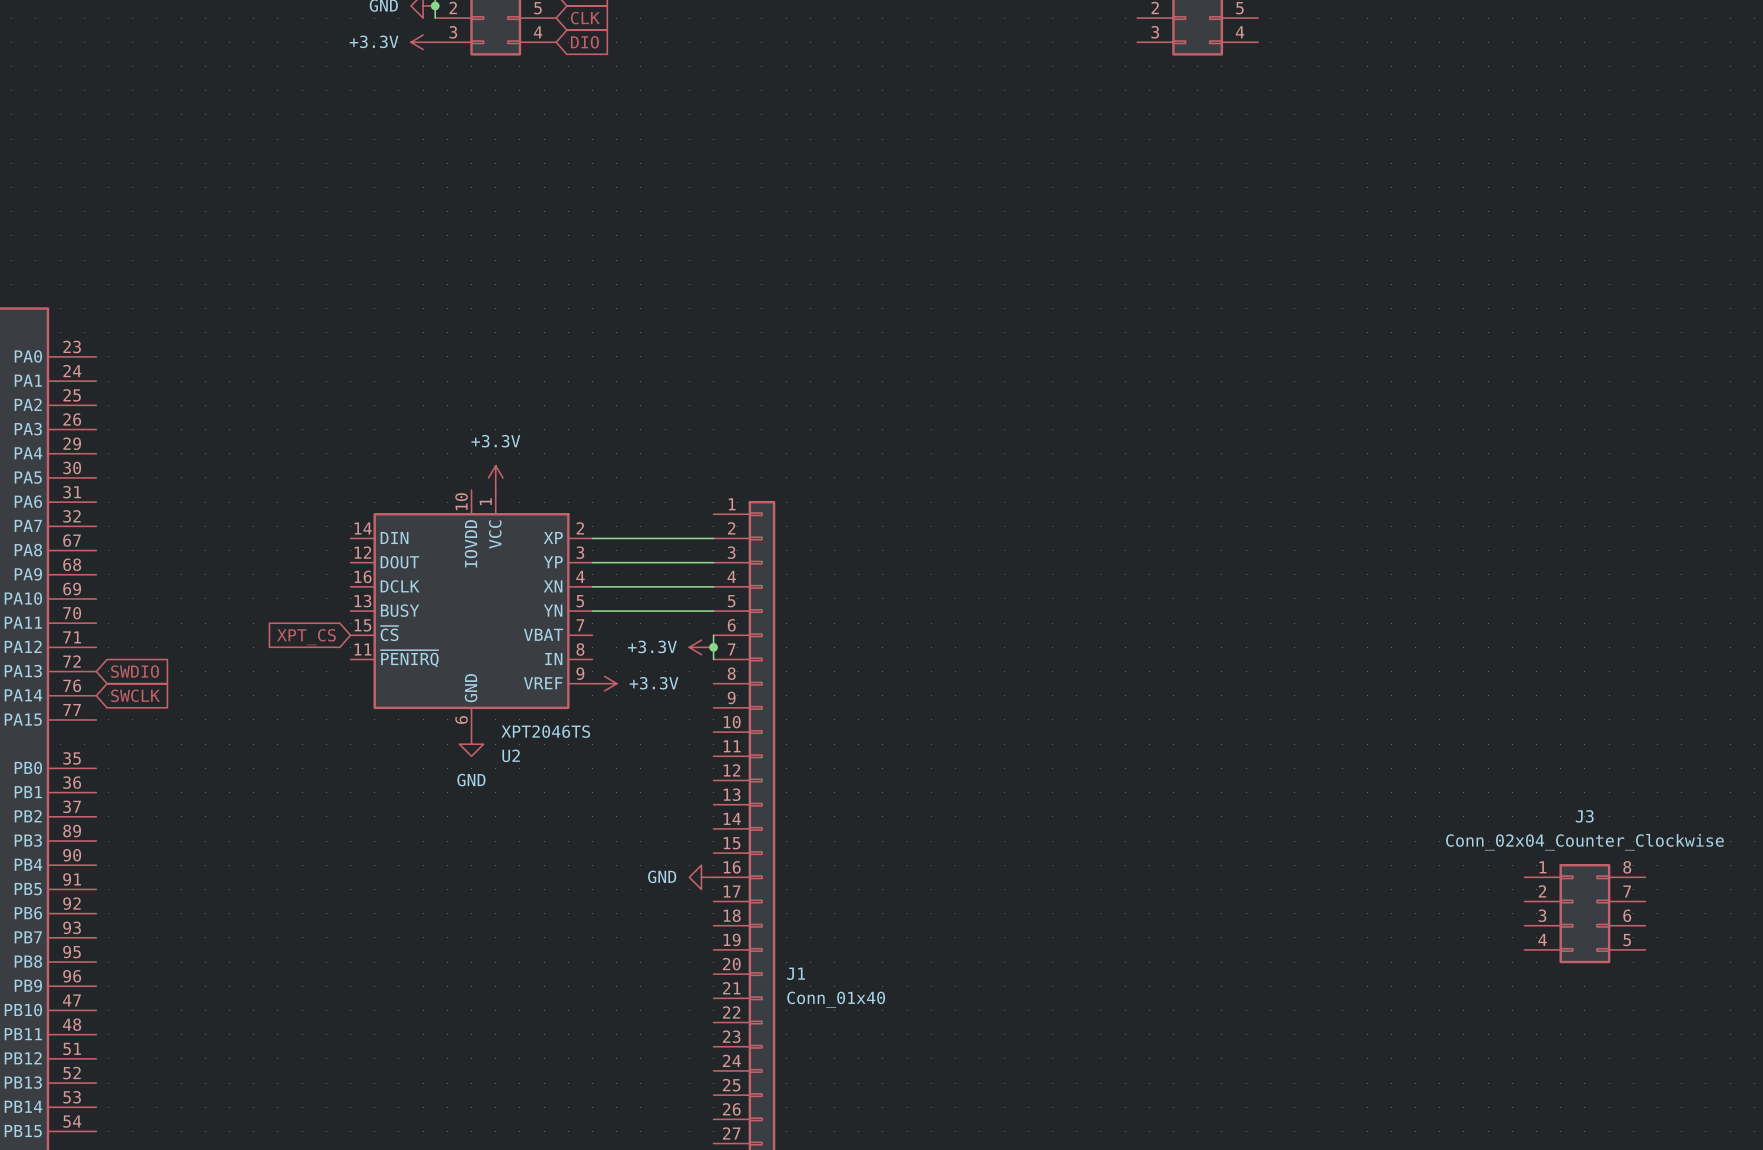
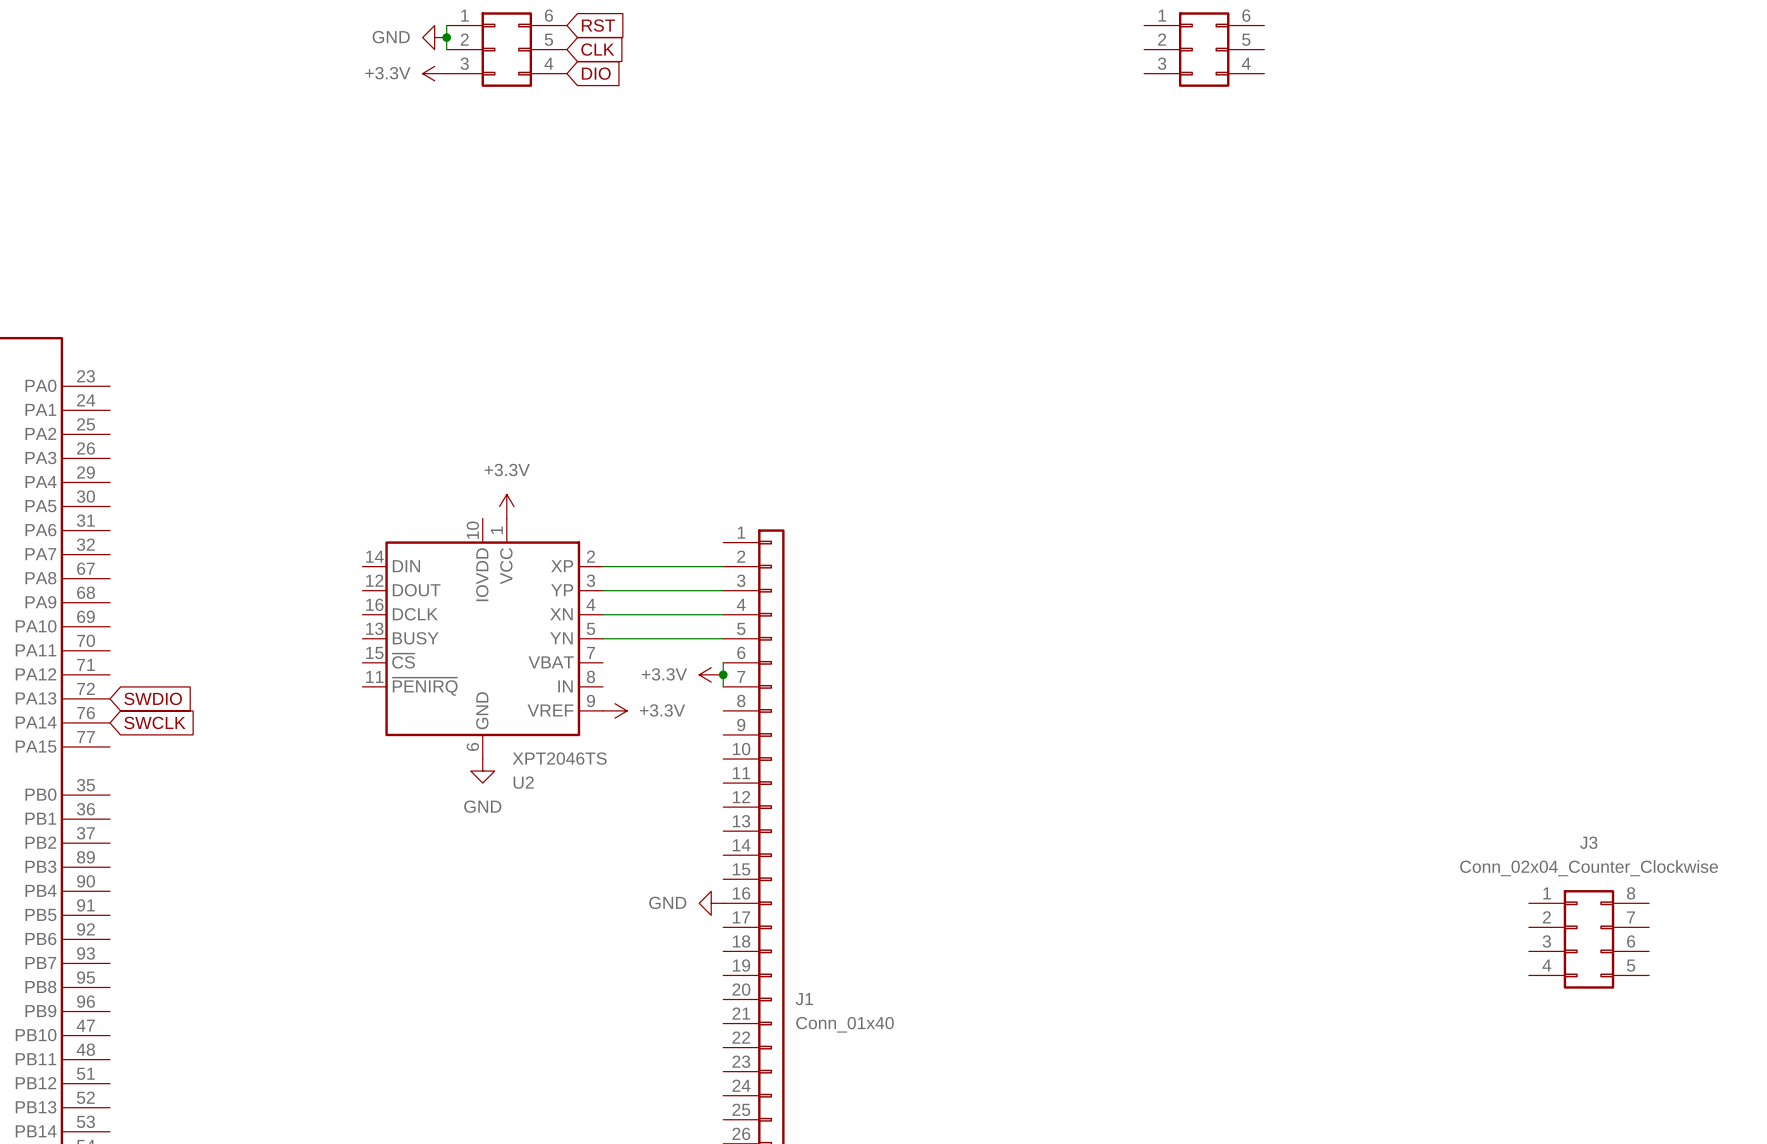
global label: XPT_CS (306, 637) -> none

